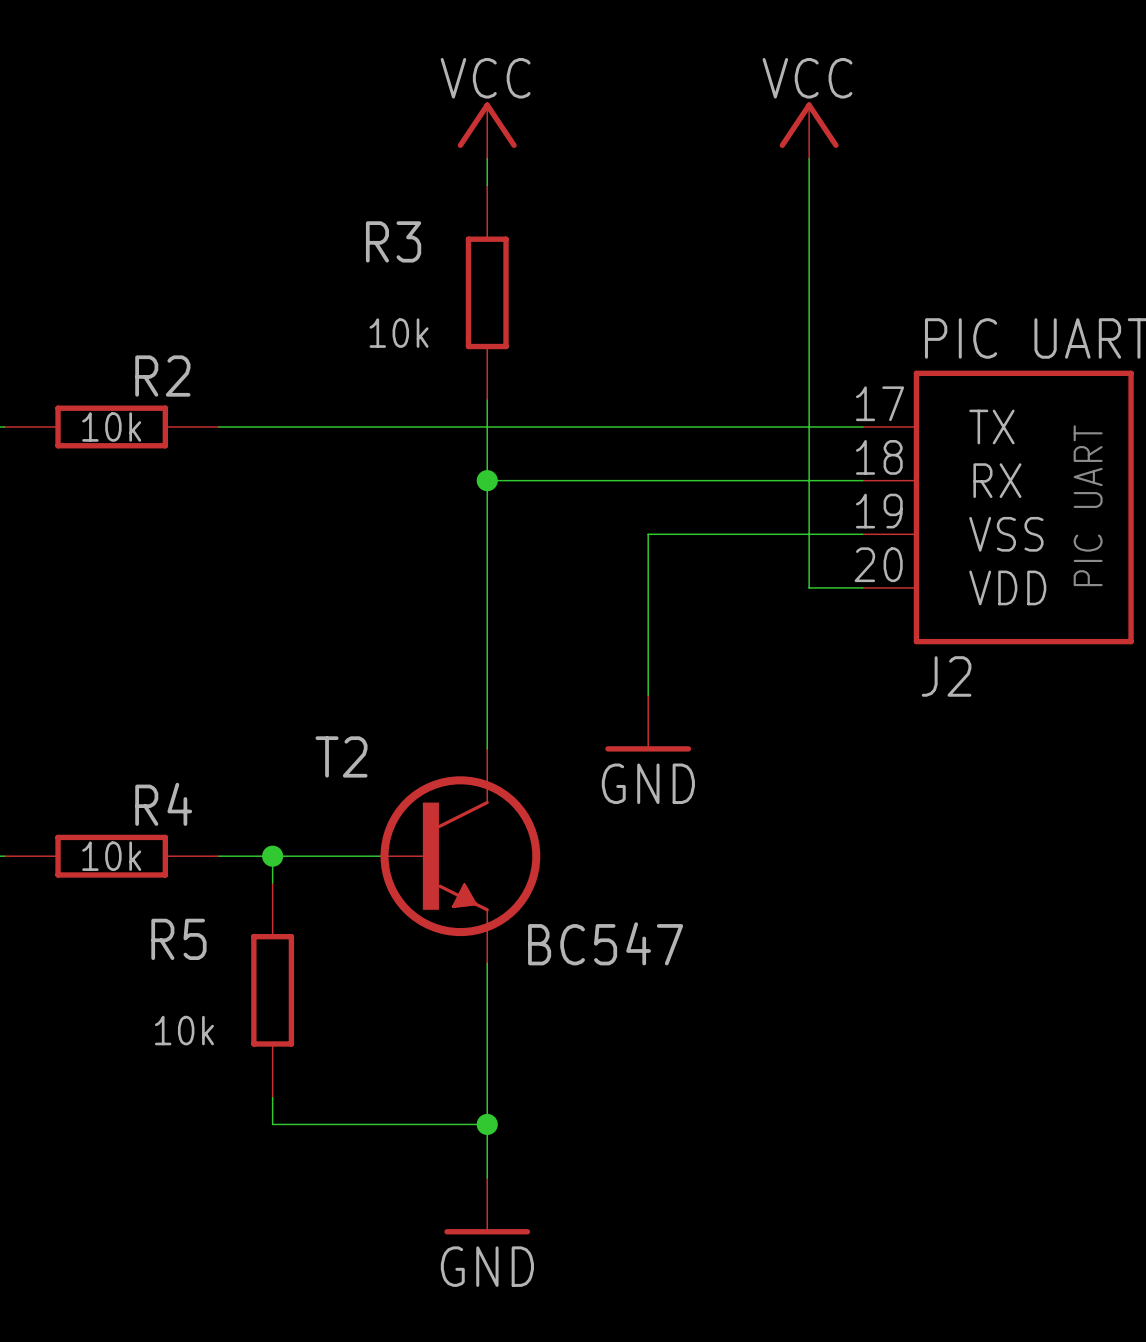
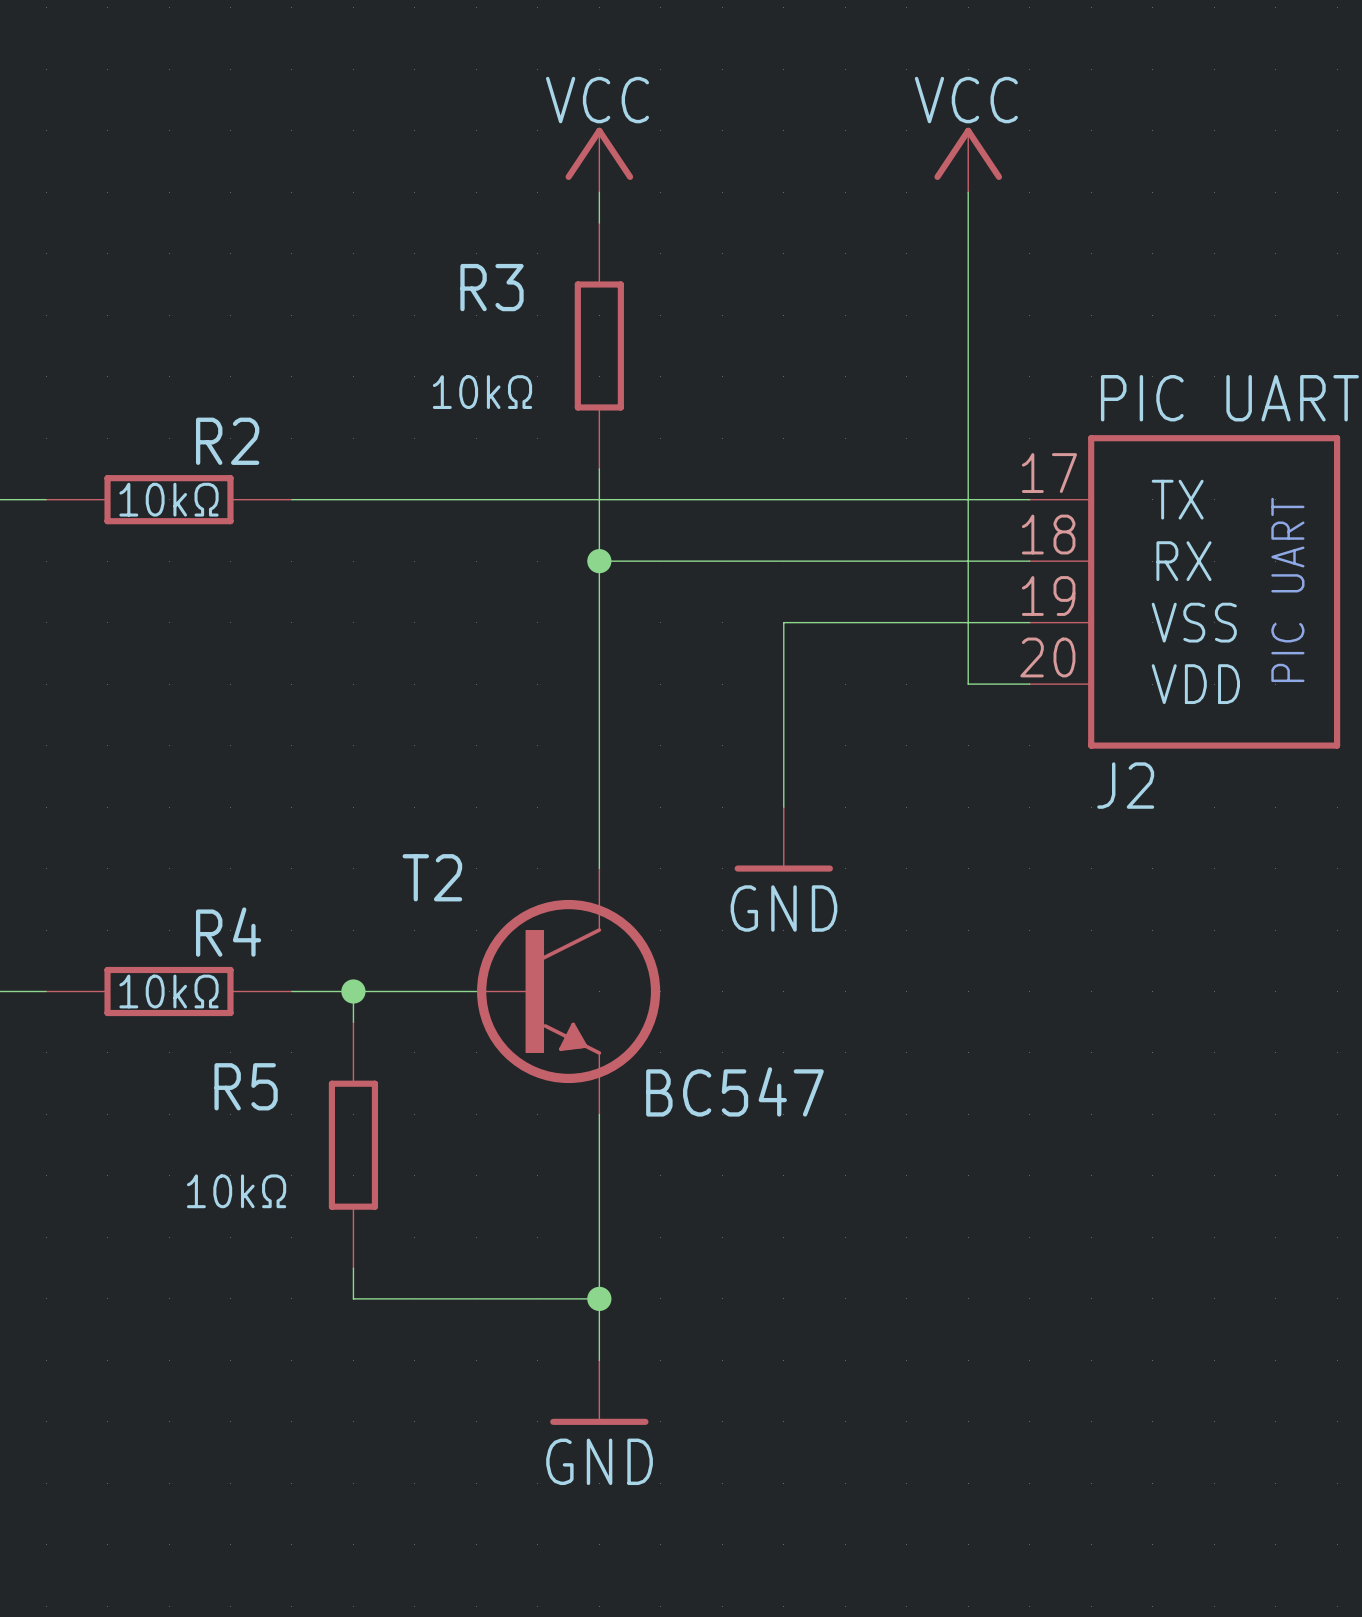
R3 value: 10k (399, 333) -> 10kΩ (482, 392)
R2 value: 10k (111, 426) -> 10kΩ (169, 499)
R4 value: 10k (111, 856) -> 10kΩ (169, 991)
R5 value: 10k (184, 1030) -> 10kΩ (236, 1191)

